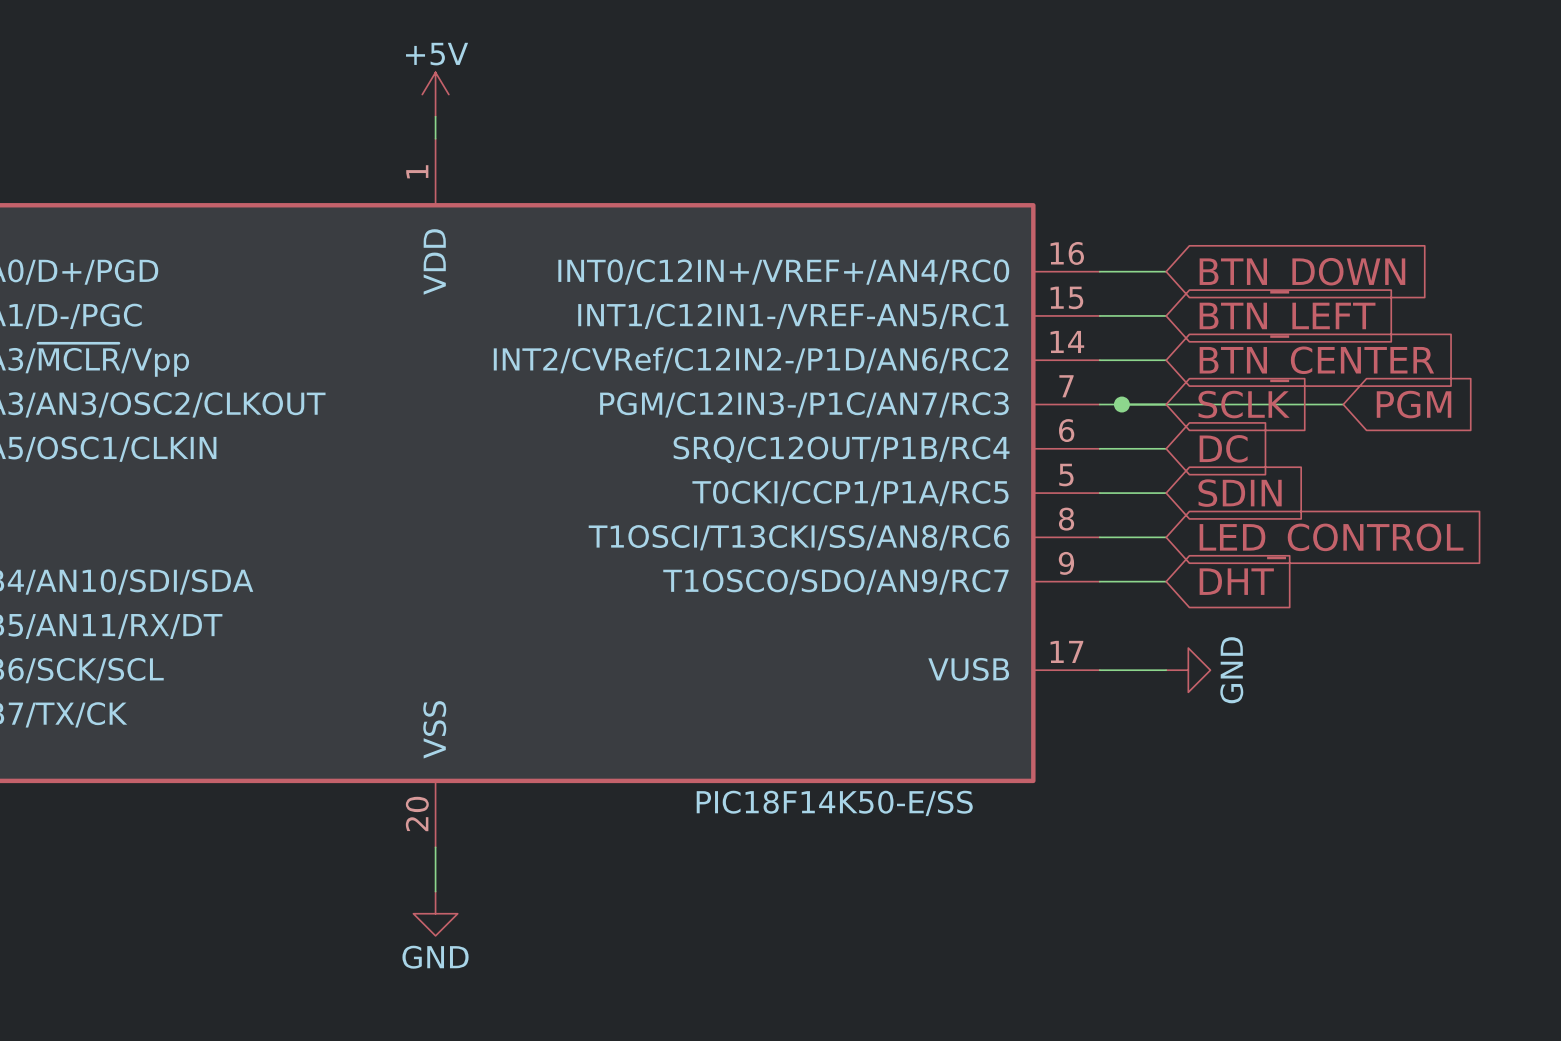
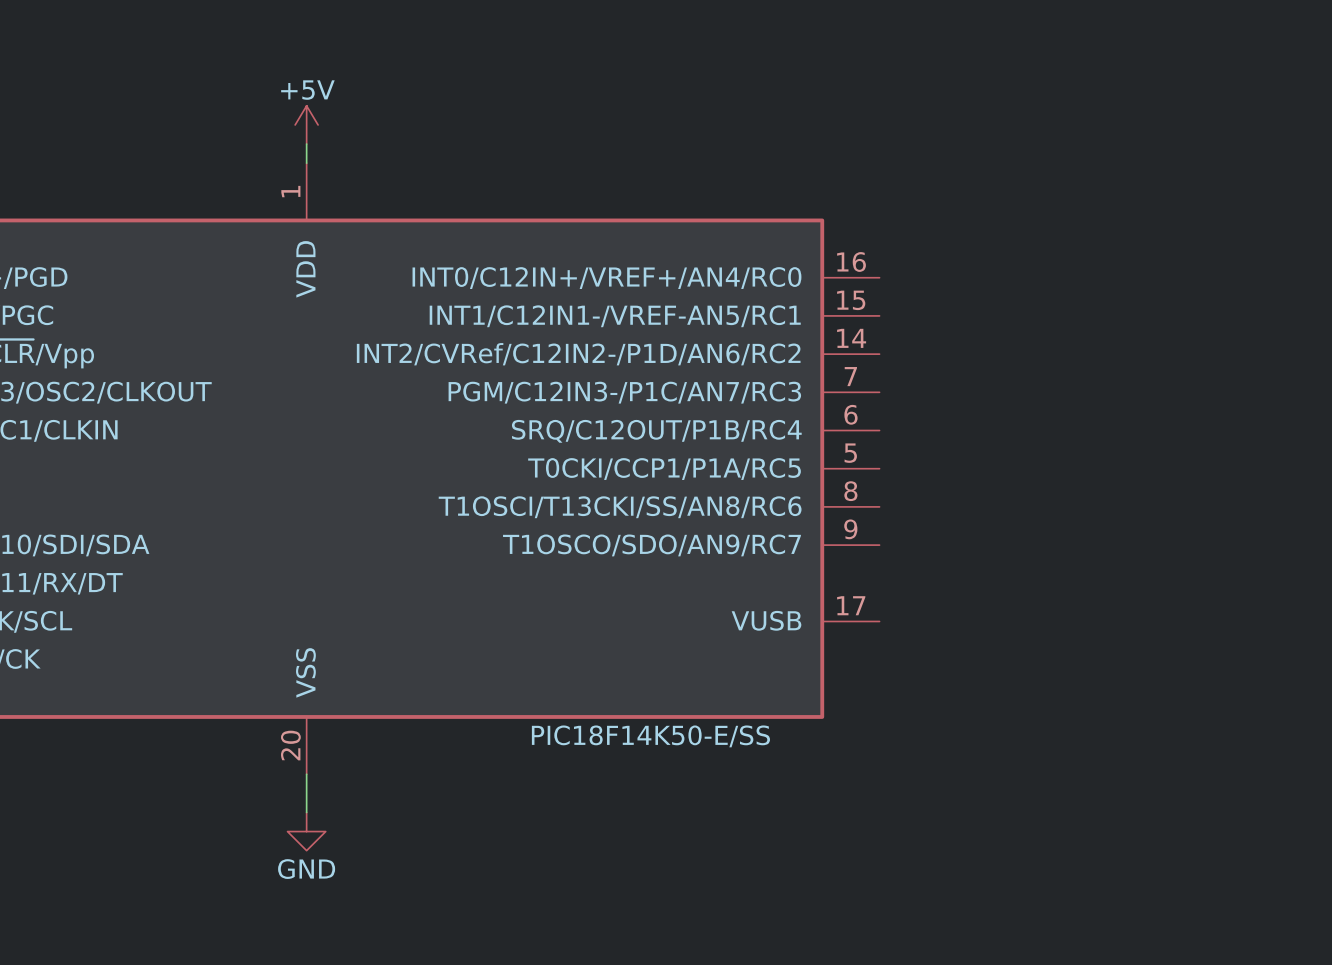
wire: (1099, 271) (1166, 271) -> none
global label: BTN_DOWN (1302, 275) -> none
wire: (1099, 315) (1166, 315) -> none
global label: BTN_LEFT (1287, 320) -> none
wire: (1099, 360) (1166, 360) -> none
global label: BTN_CENTER (1316, 364) -> none
wire: (1099, 404) (1343, 404) -> none
junction: (1121, 404) -> none
global label: SCLK (1244, 404) -> none
global label: PGM (1414, 404) -> none
wire: (1099, 448) (1166, 448) -> none
global label: DC (1223, 448) -> none
wire: (1099, 493) (1166, 493) -> none
global label: SDIN (1240, 493) -> none
wire: (1099, 537) (1166, 537) -> none
global label: LED_CONTROL (1331, 541) -> none
wire: (1099, 581) (1166, 581) -> none
global label: DHT (1236, 581) -> none
wire: (1099, 670) (1166, 670) -> none
power symbol: GND (1188, 670) -> none

